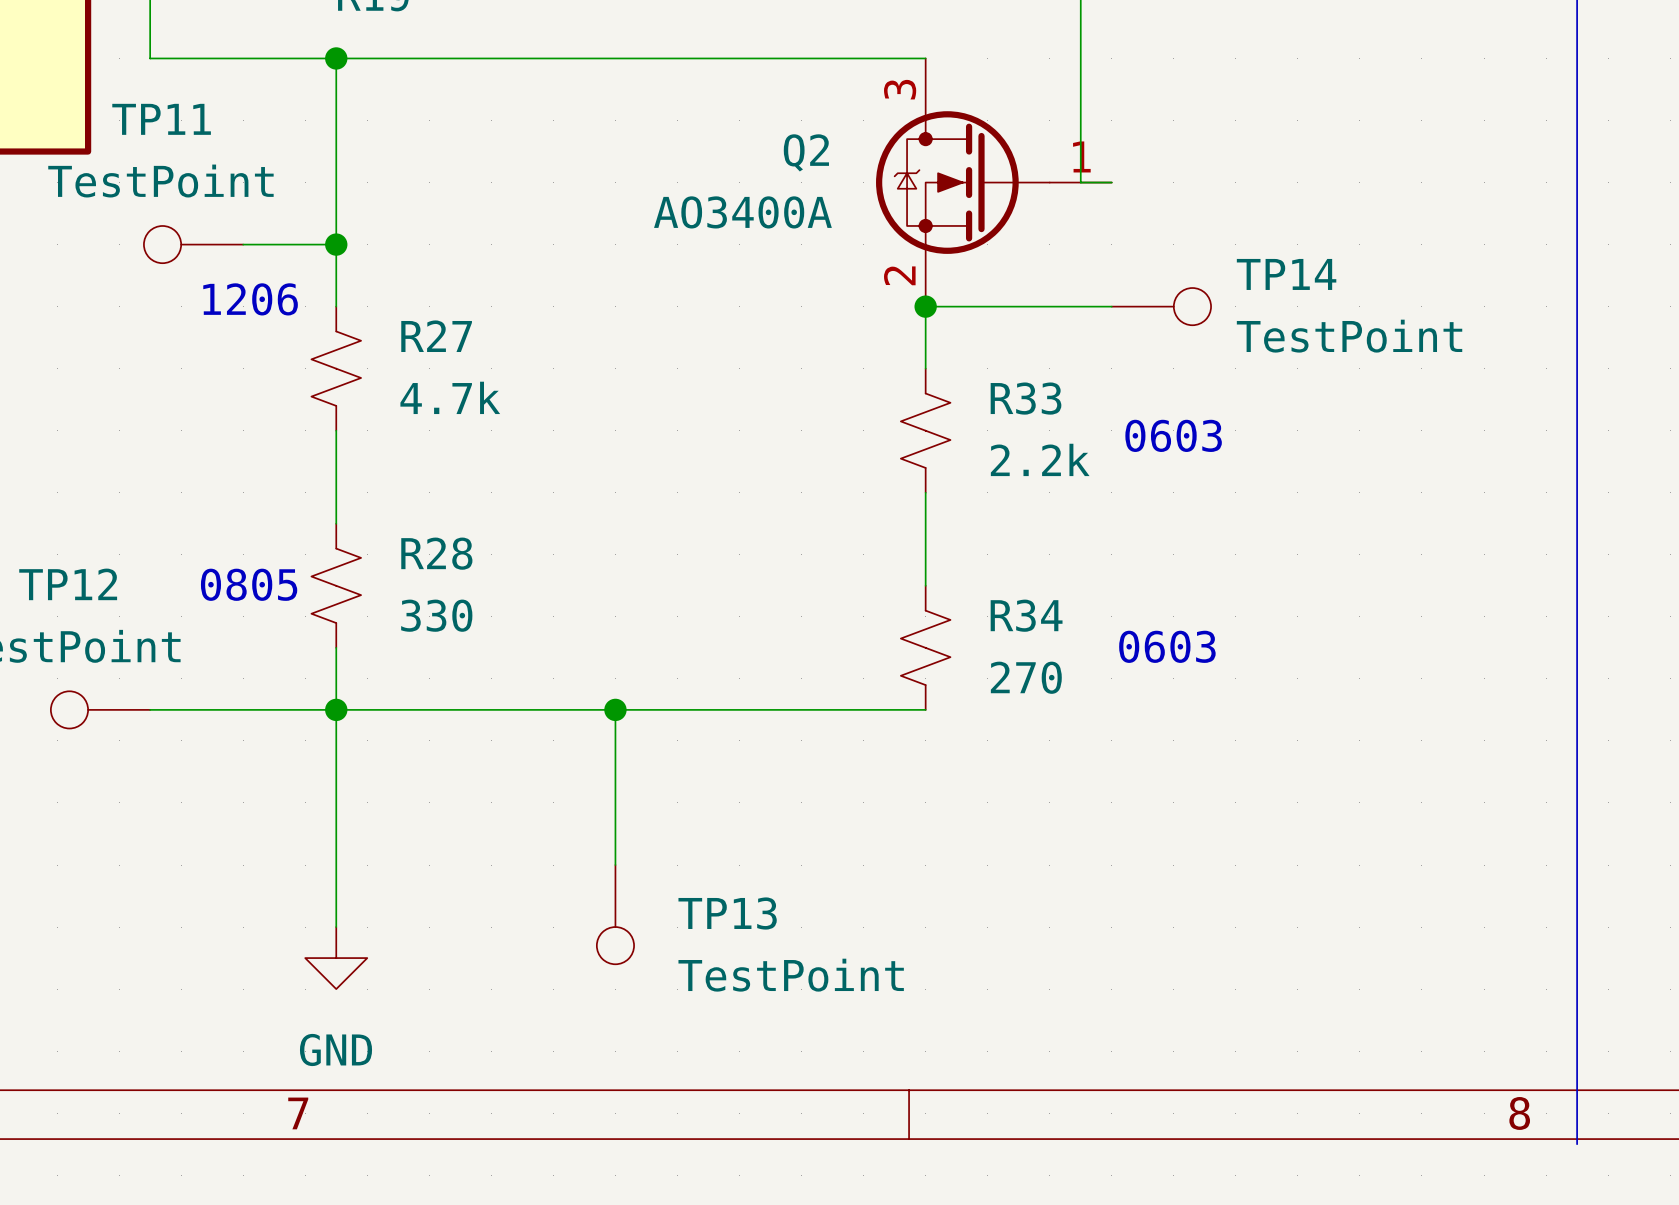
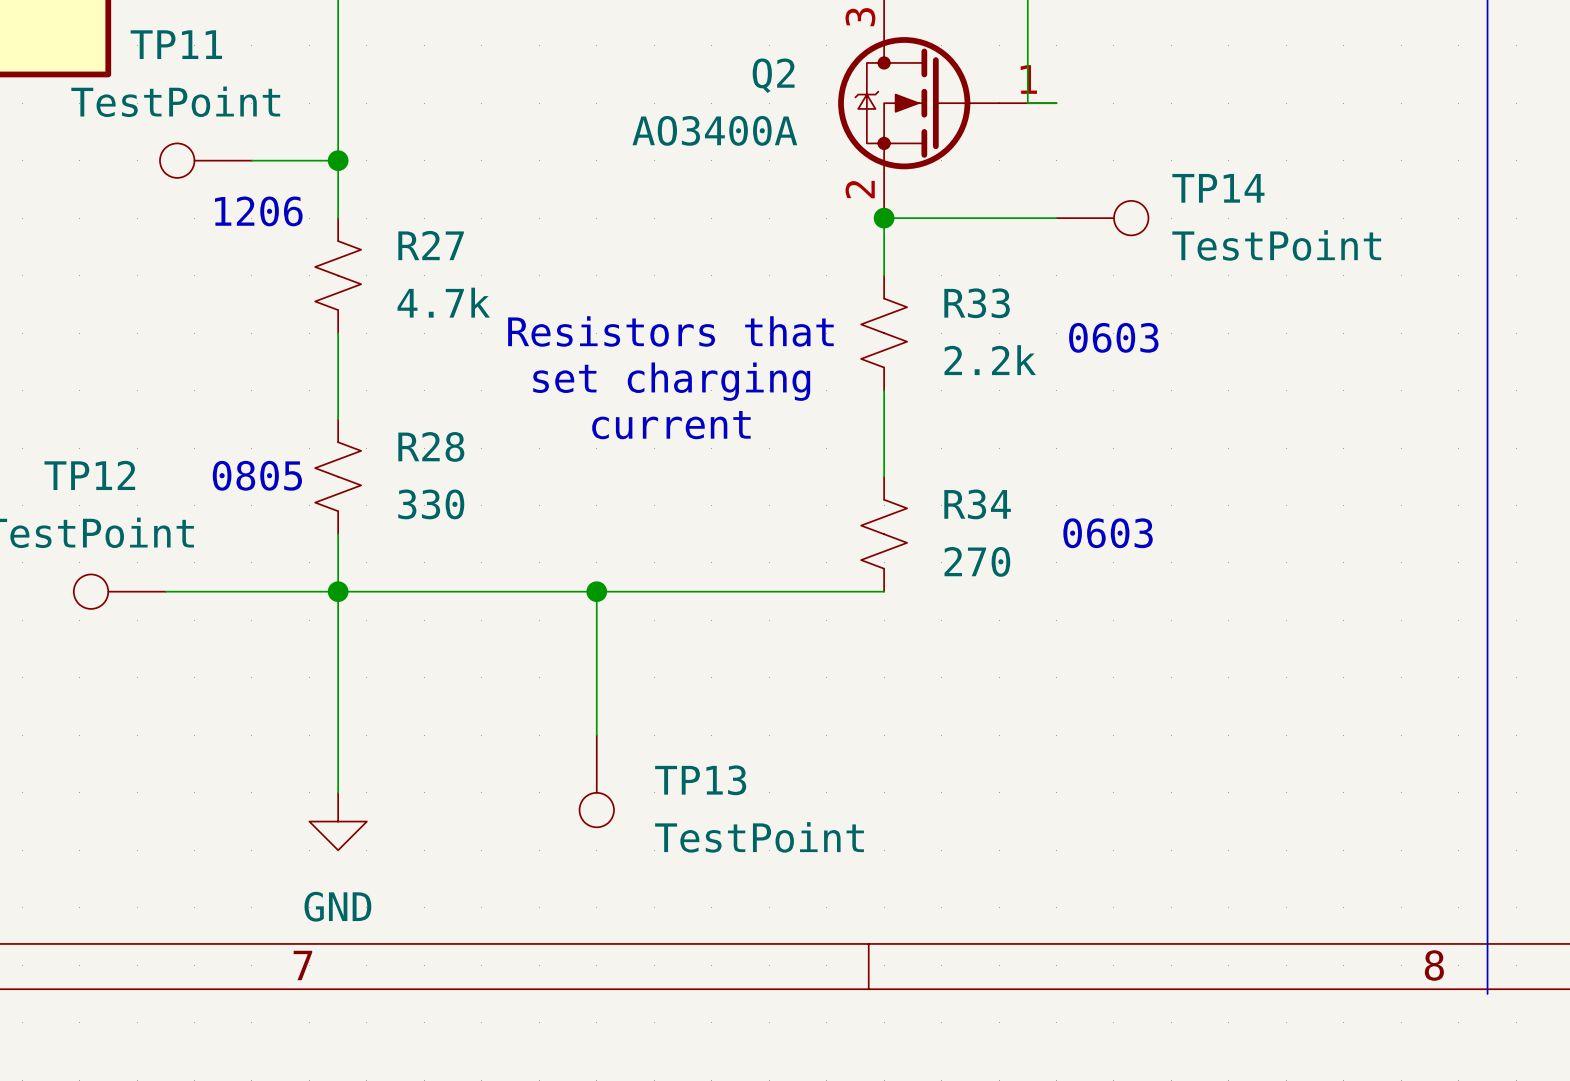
text: none -> Resistors that (670, 331)
text: none -> set charging (671, 381)
text: none -> current (671, 425)

